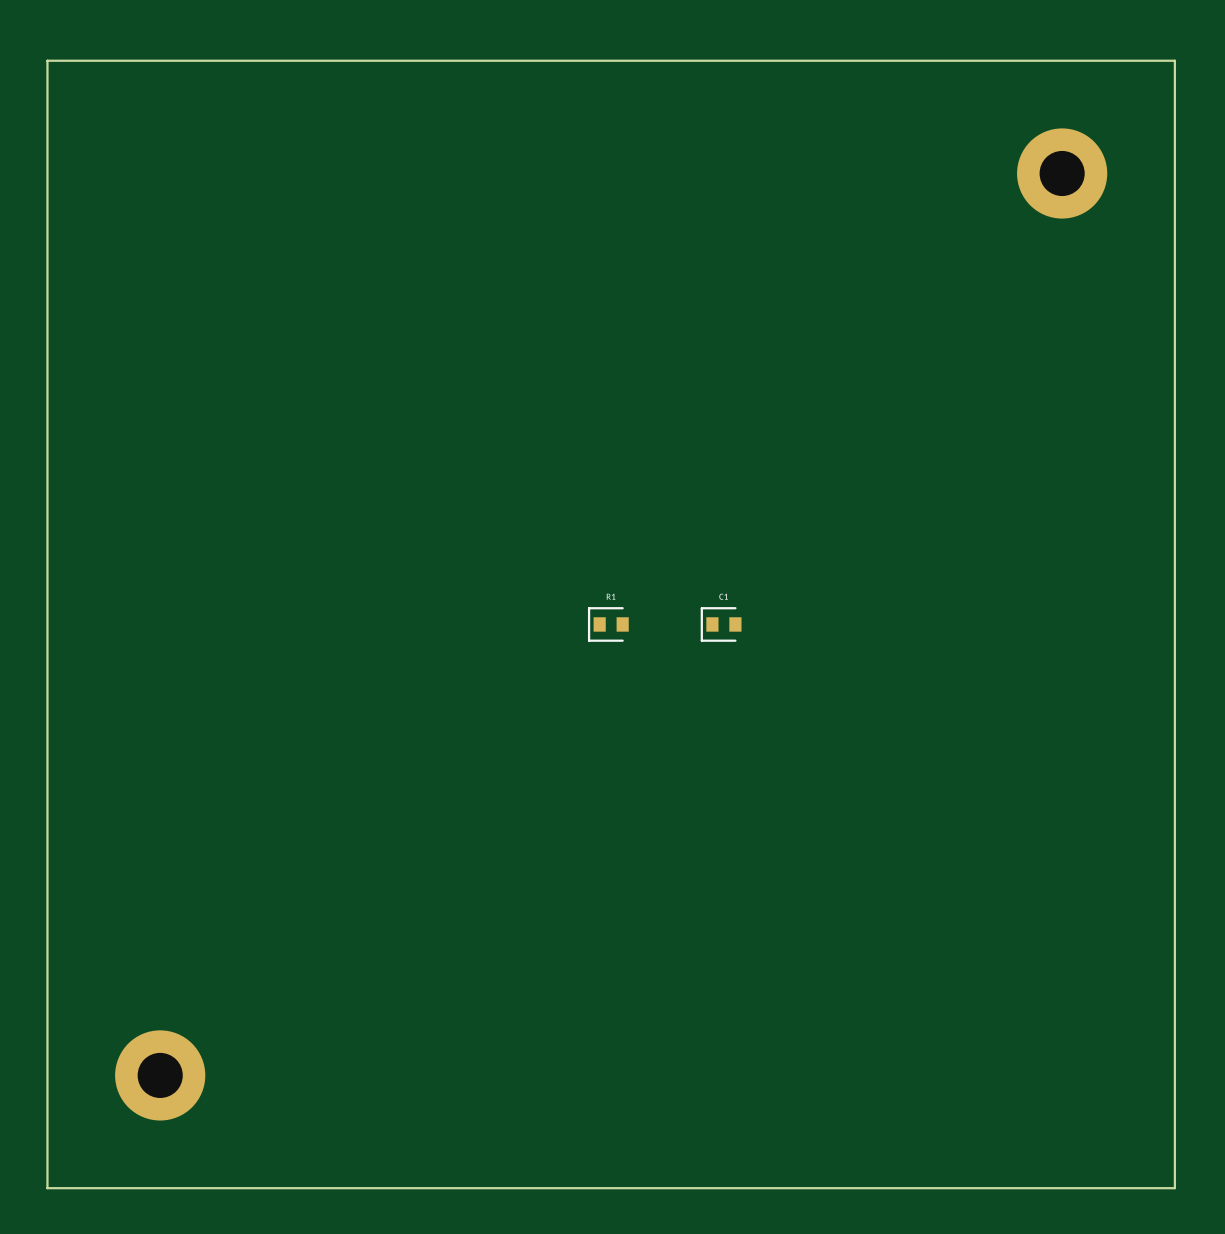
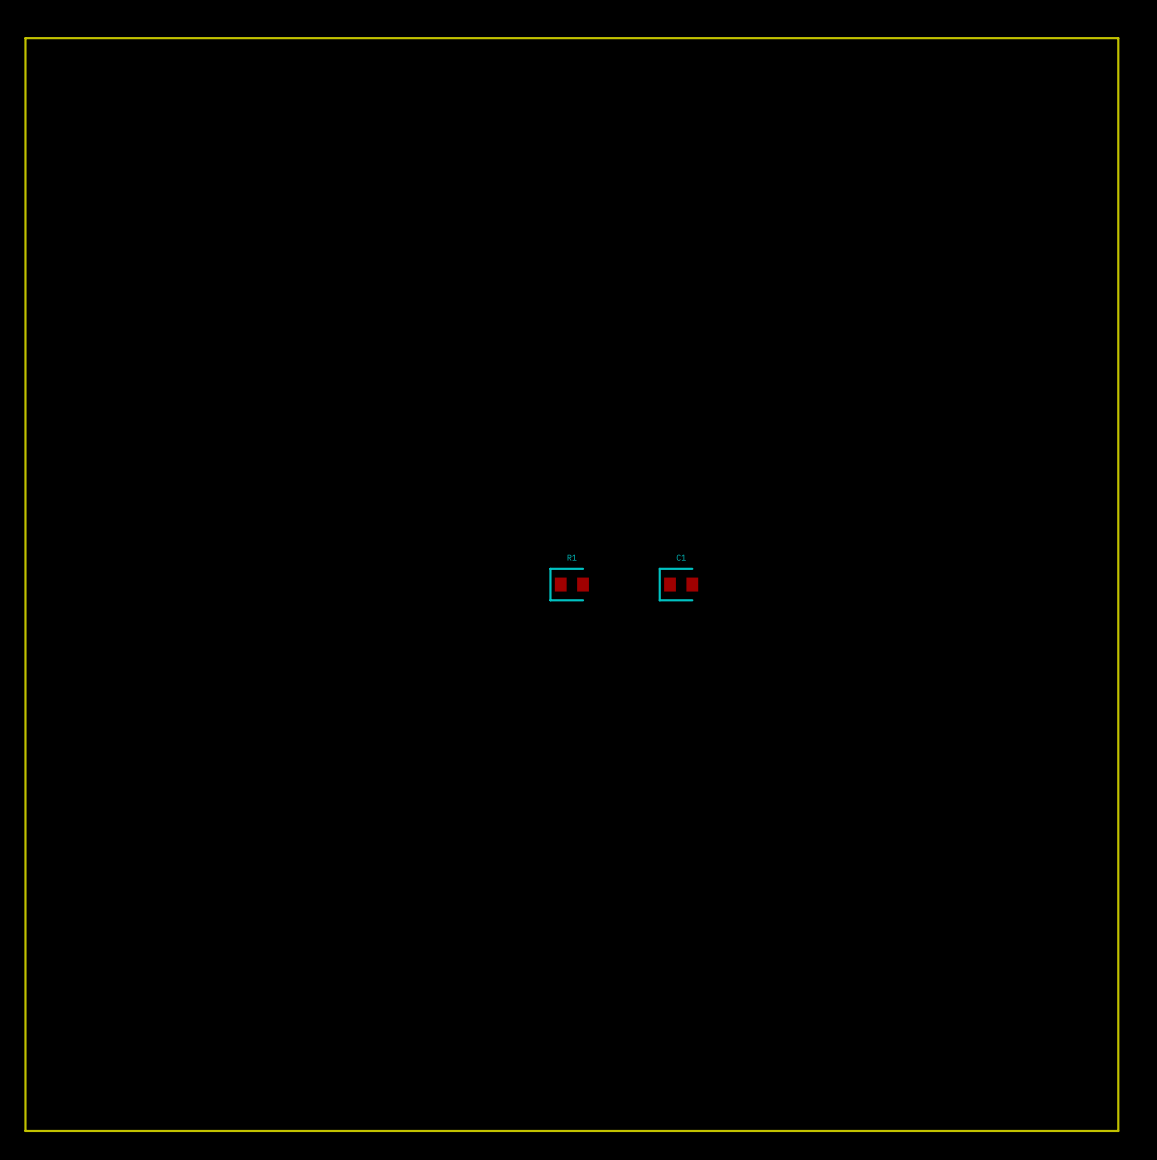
part: (1062, 173) -> none
part: (160, 1075) -> none

